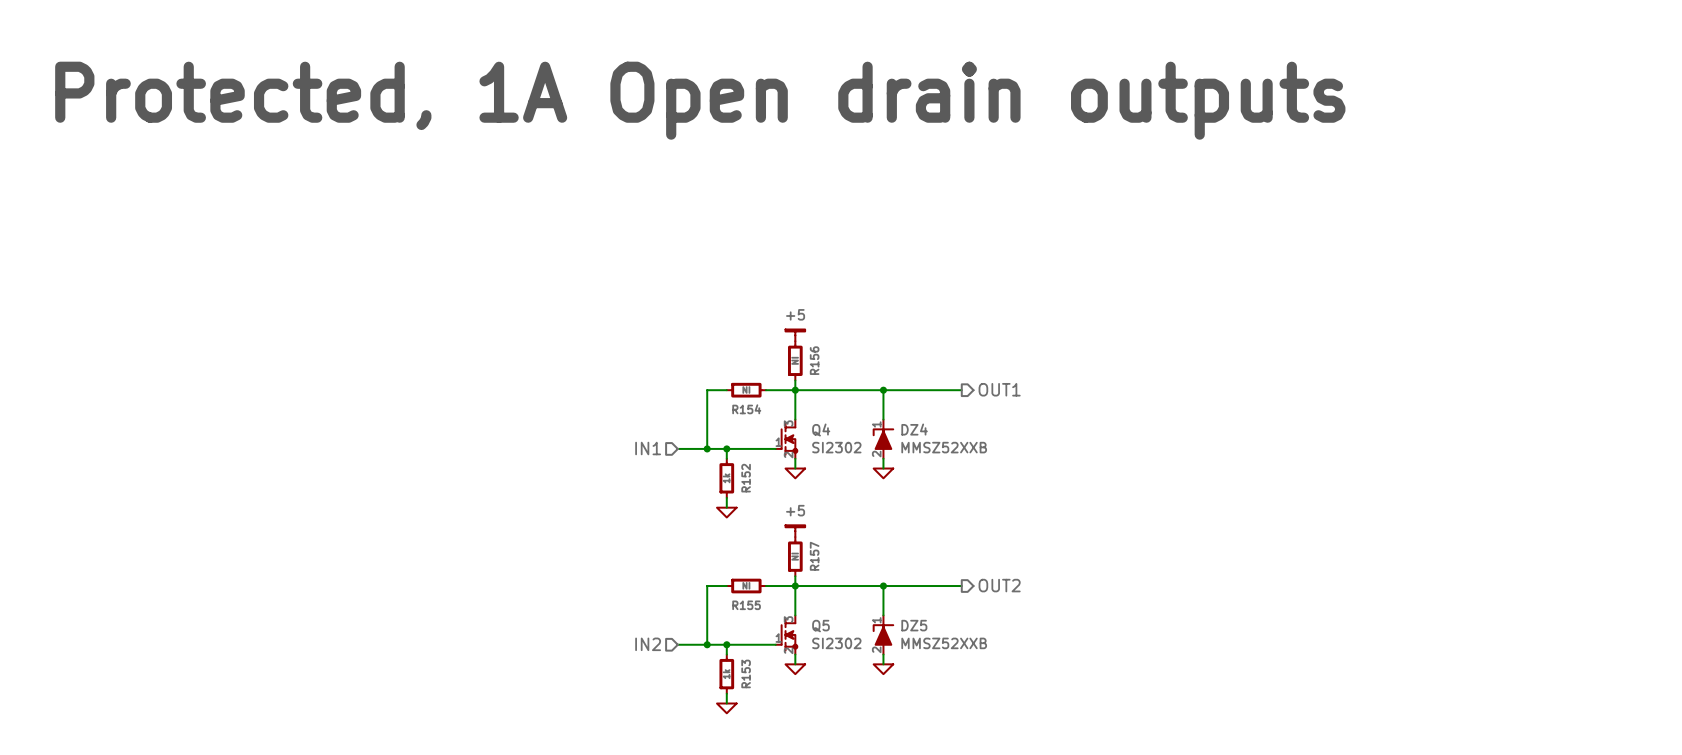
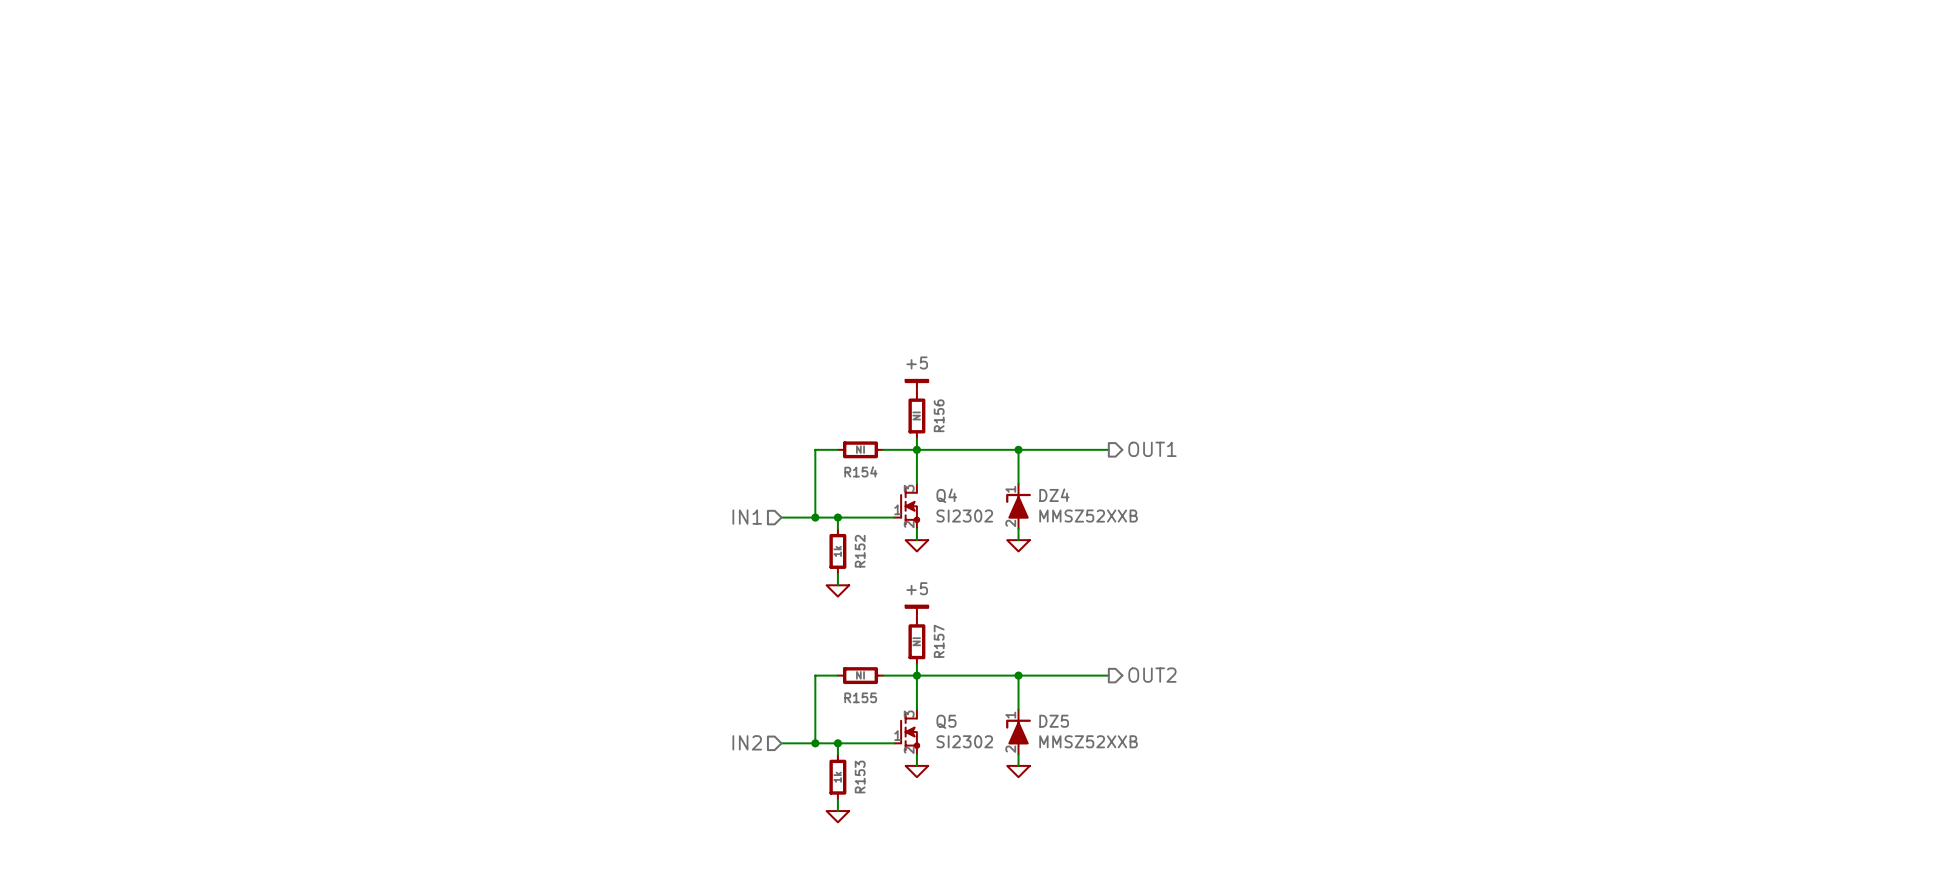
text: Protected, 1A Open drain outputs (700, 100) -> none

